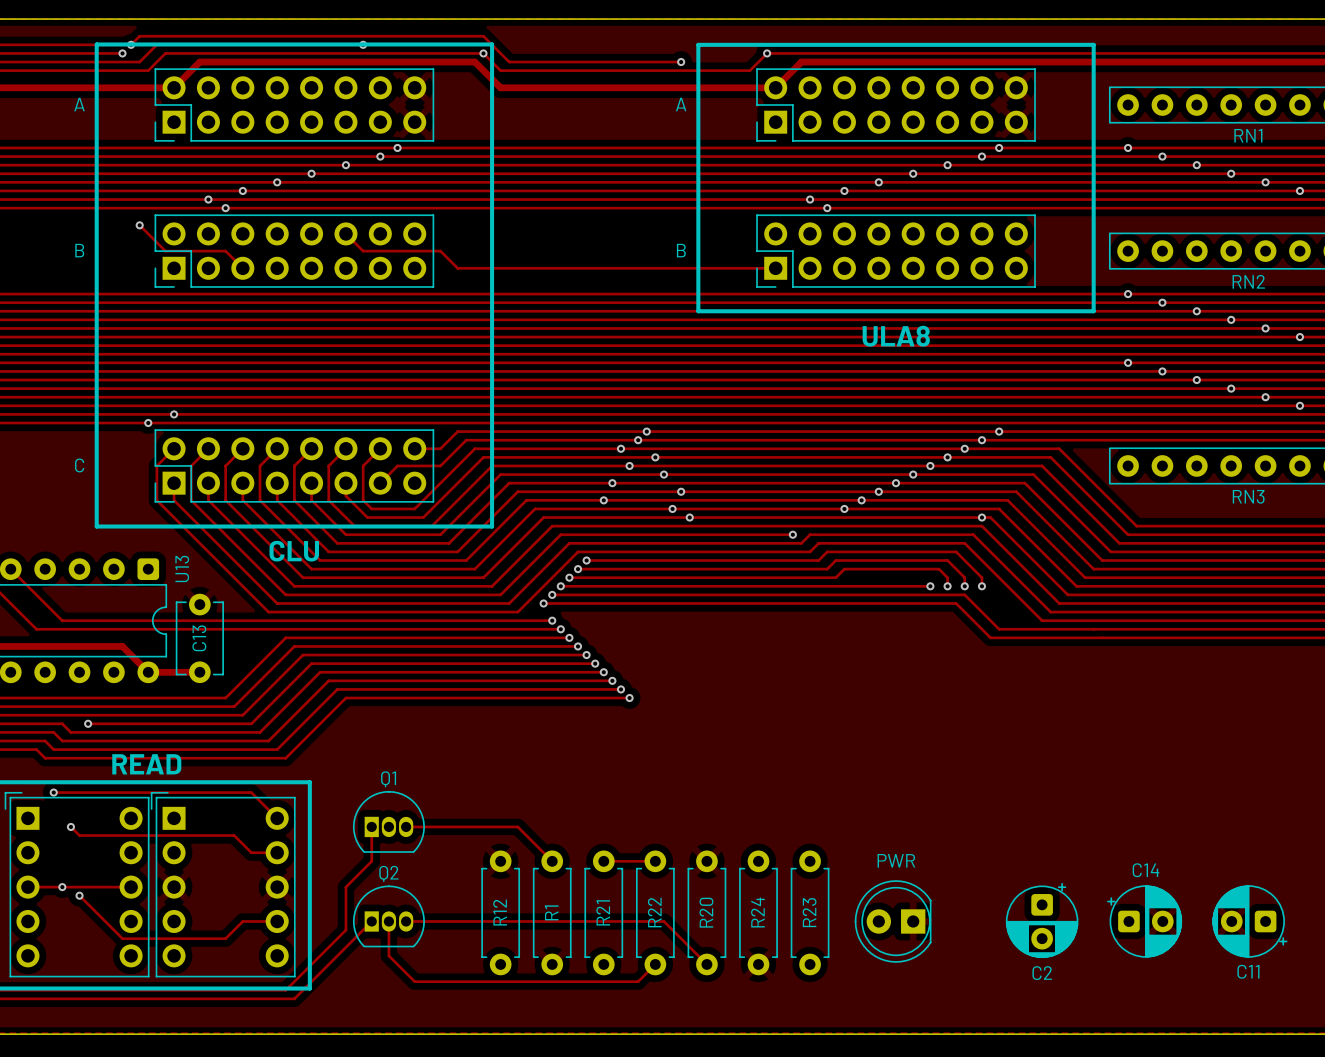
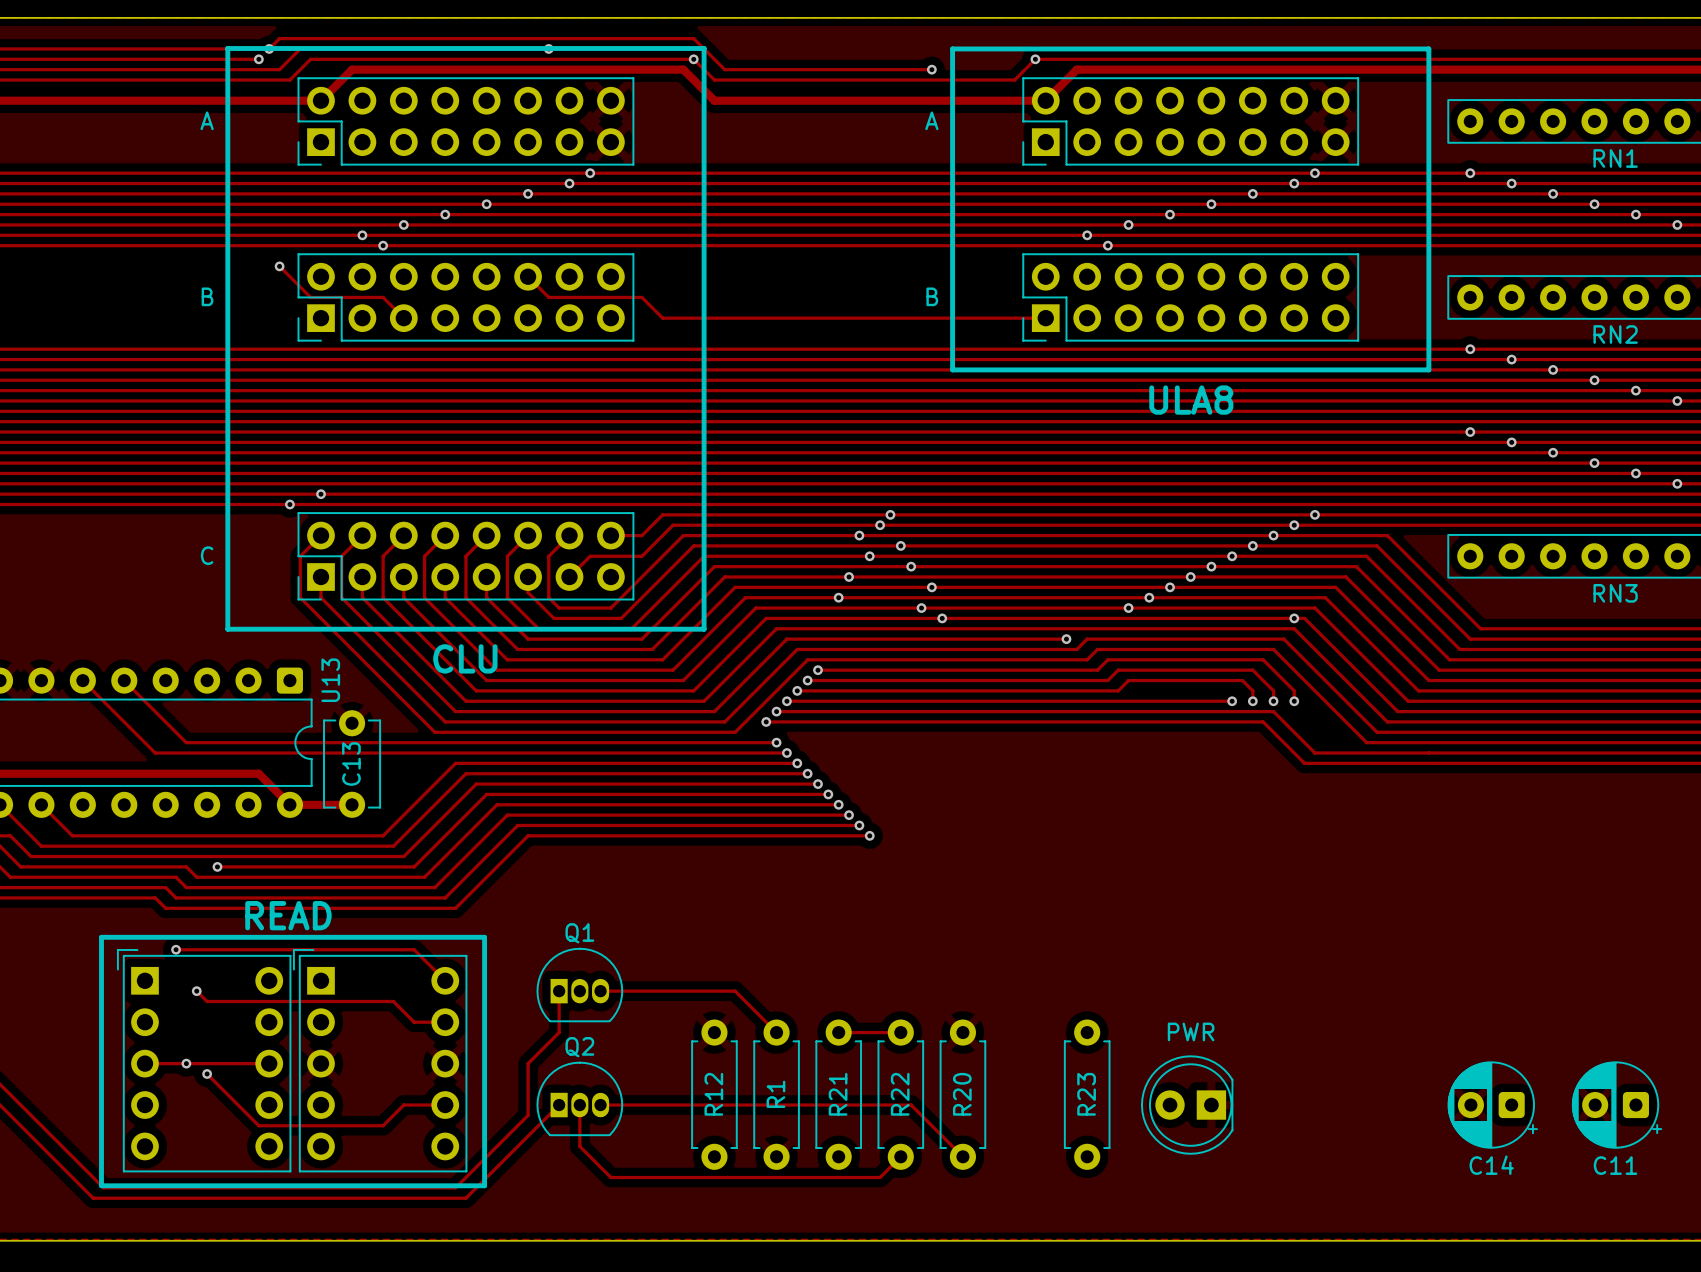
R24: (758, 912) -> none
C2: (1042, 920) -> none
C14 rotation: 0° (1144, 921) -> 180° (1492, 1105)

